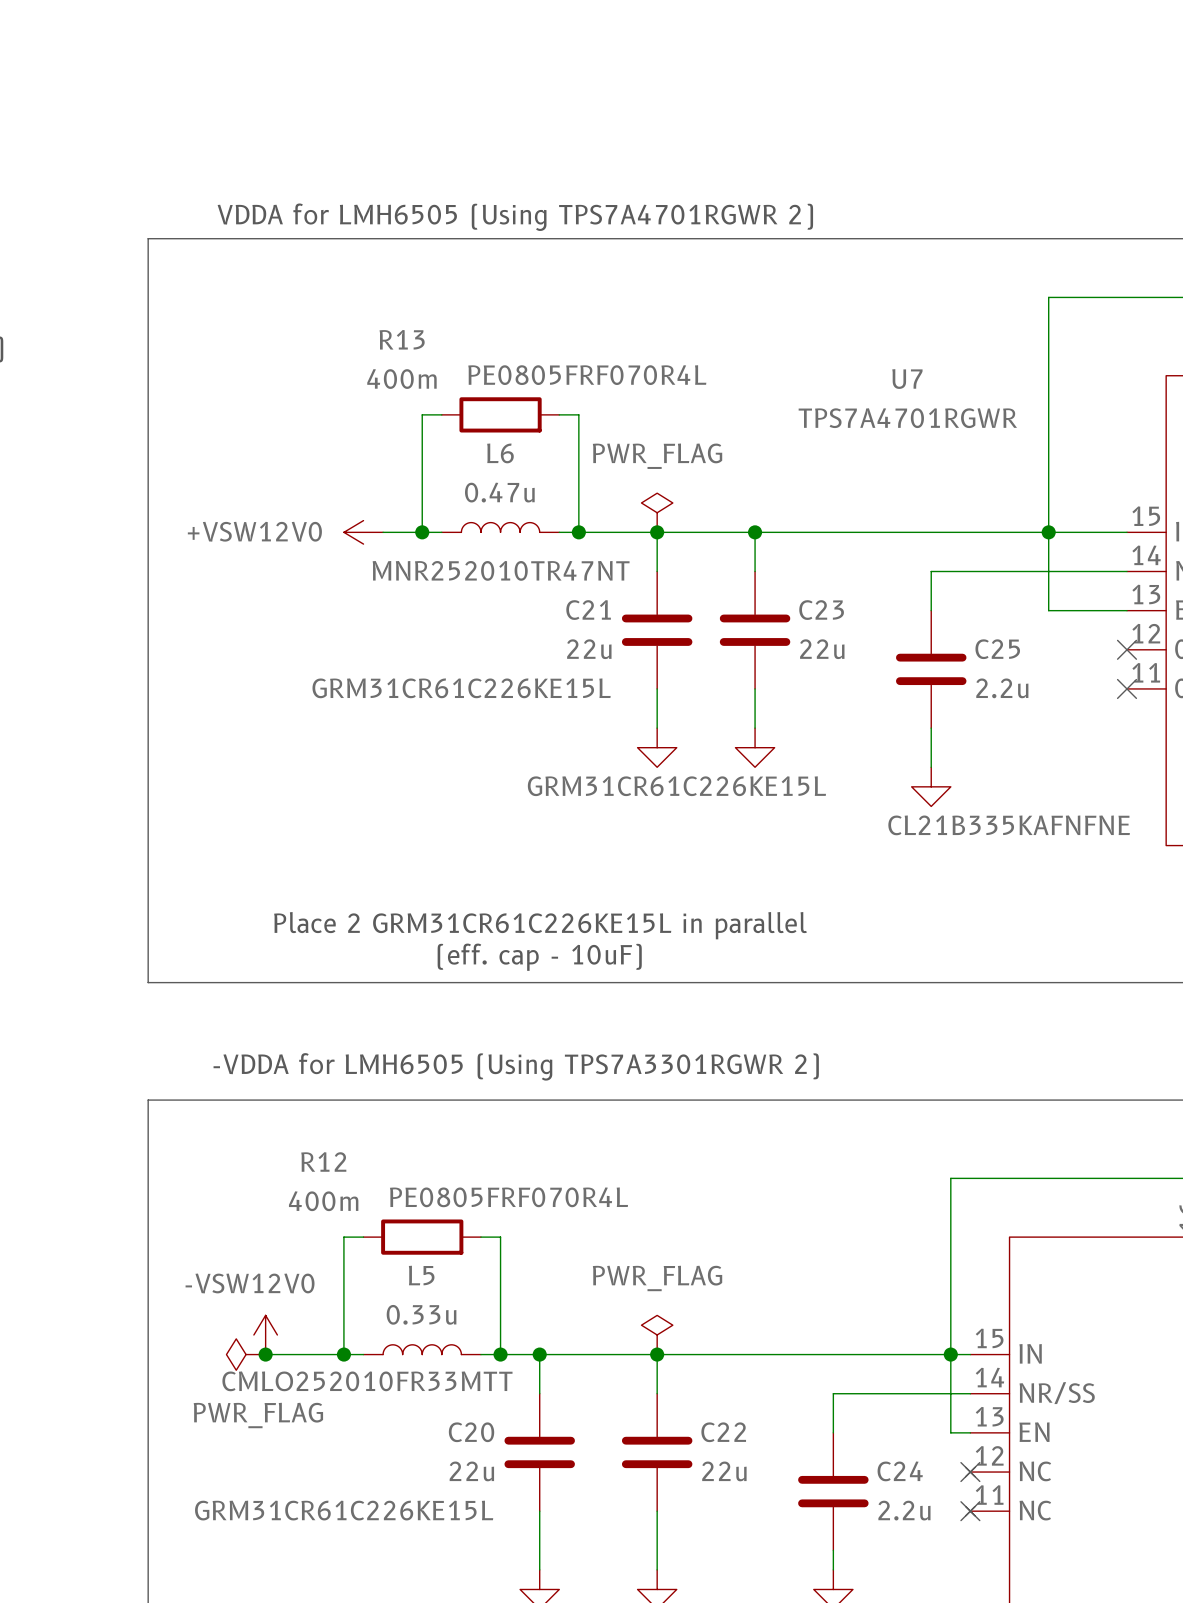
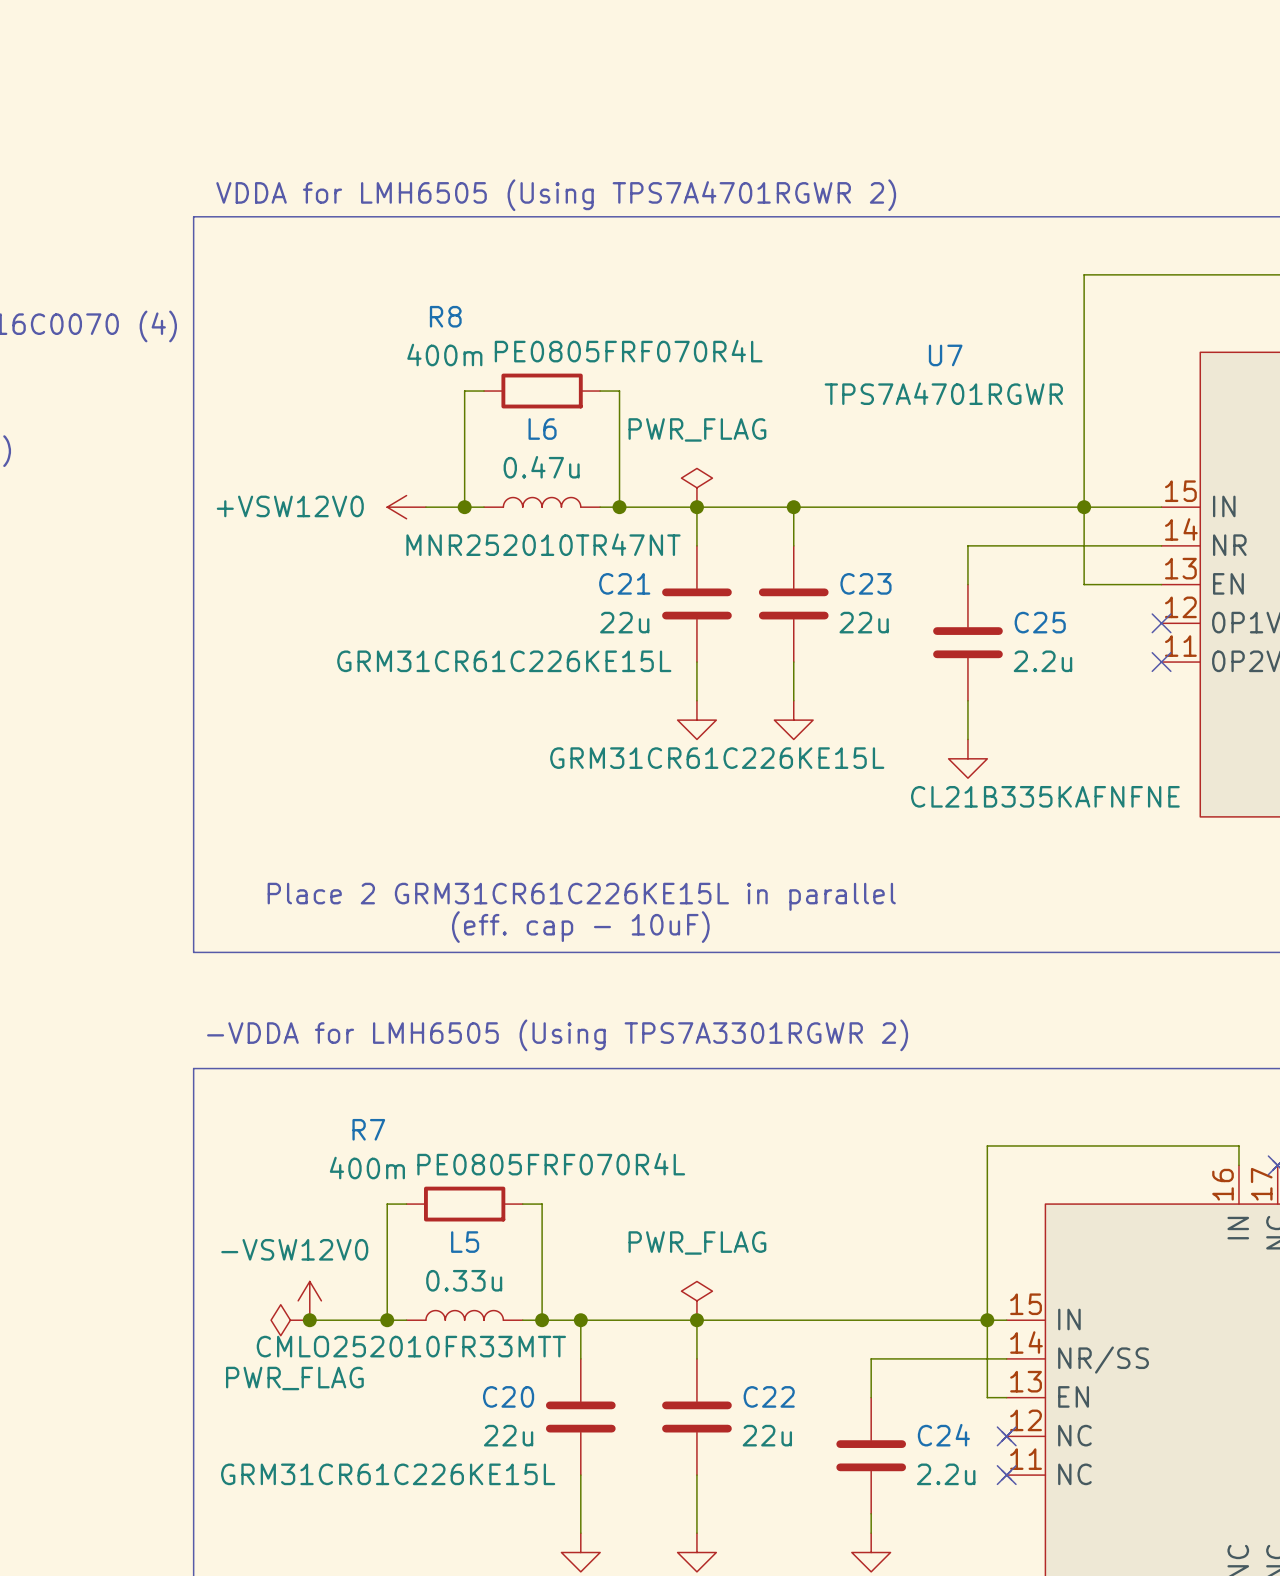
R13 name: R13 (402, 339) -> R8 (445, 316)
R12 name: R12 (323, 1161) -> R7 (368, 1129)

